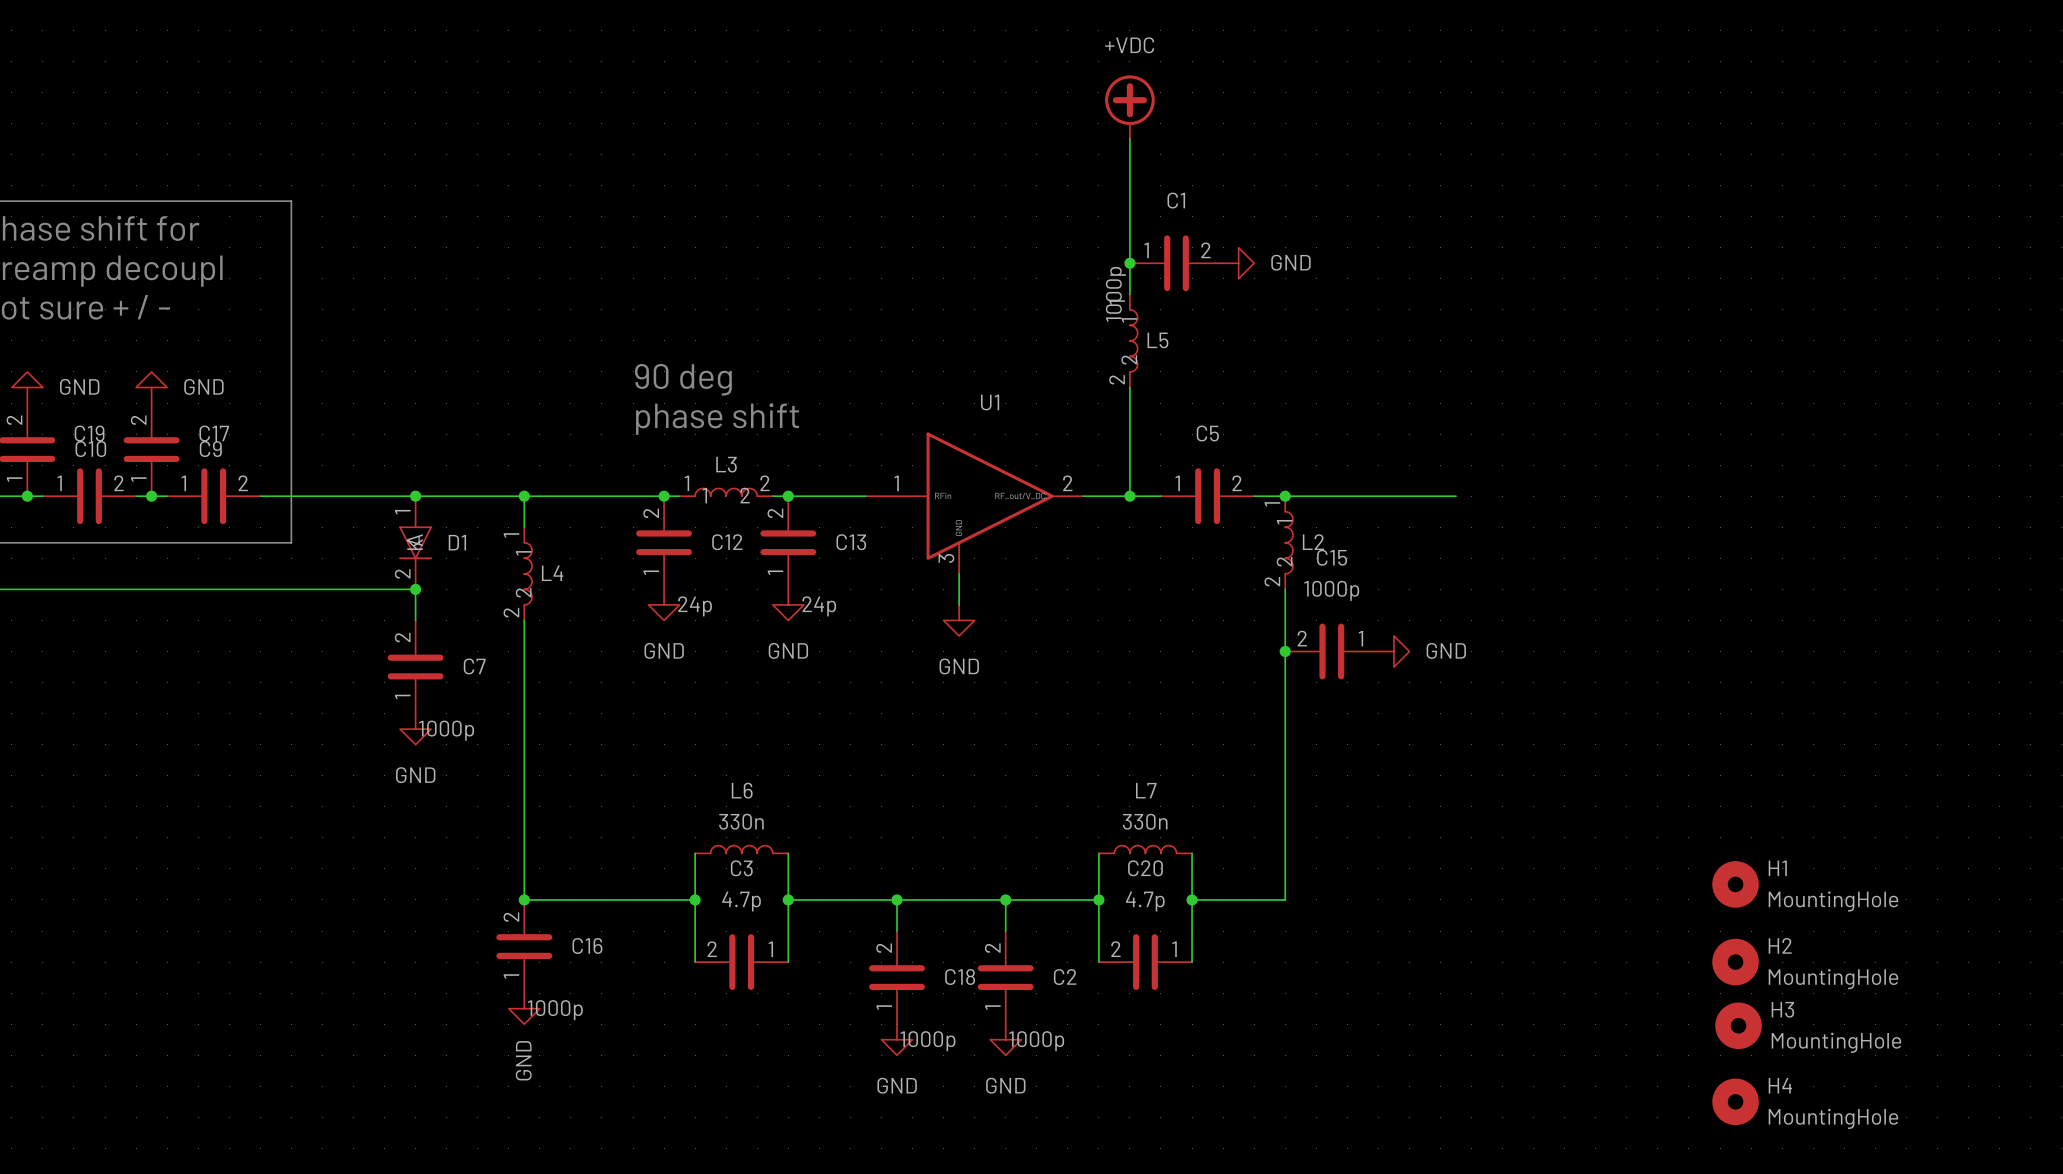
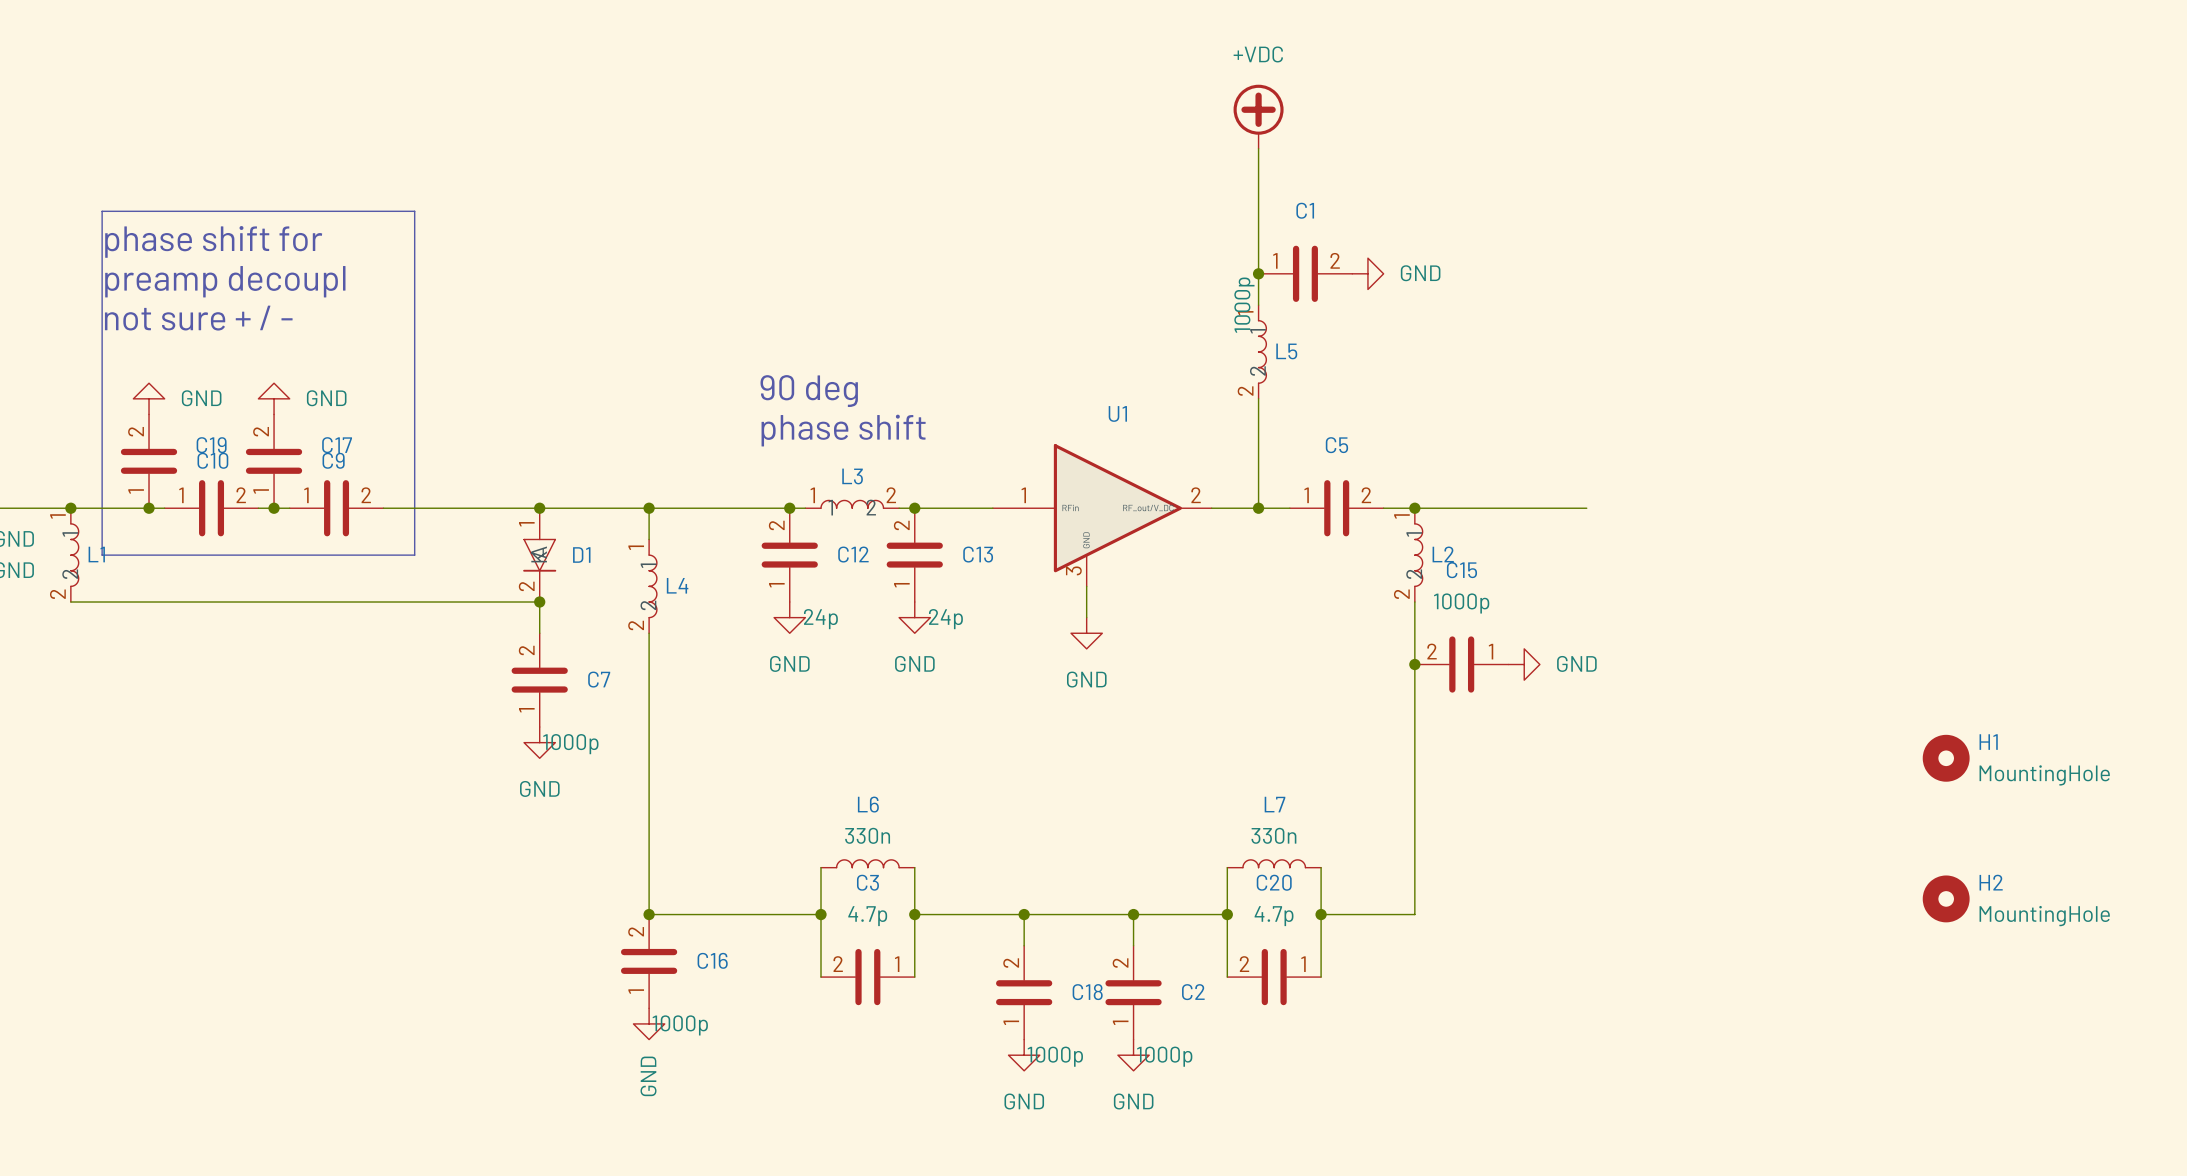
H1 position: (1735, 884) -> (1946, 758)
H2 position: (1735, 962) -> (1946, 898)
H3: MountingHole (1738, 1025) -> none
H4: MountingHole (1735, 1101) -> none

